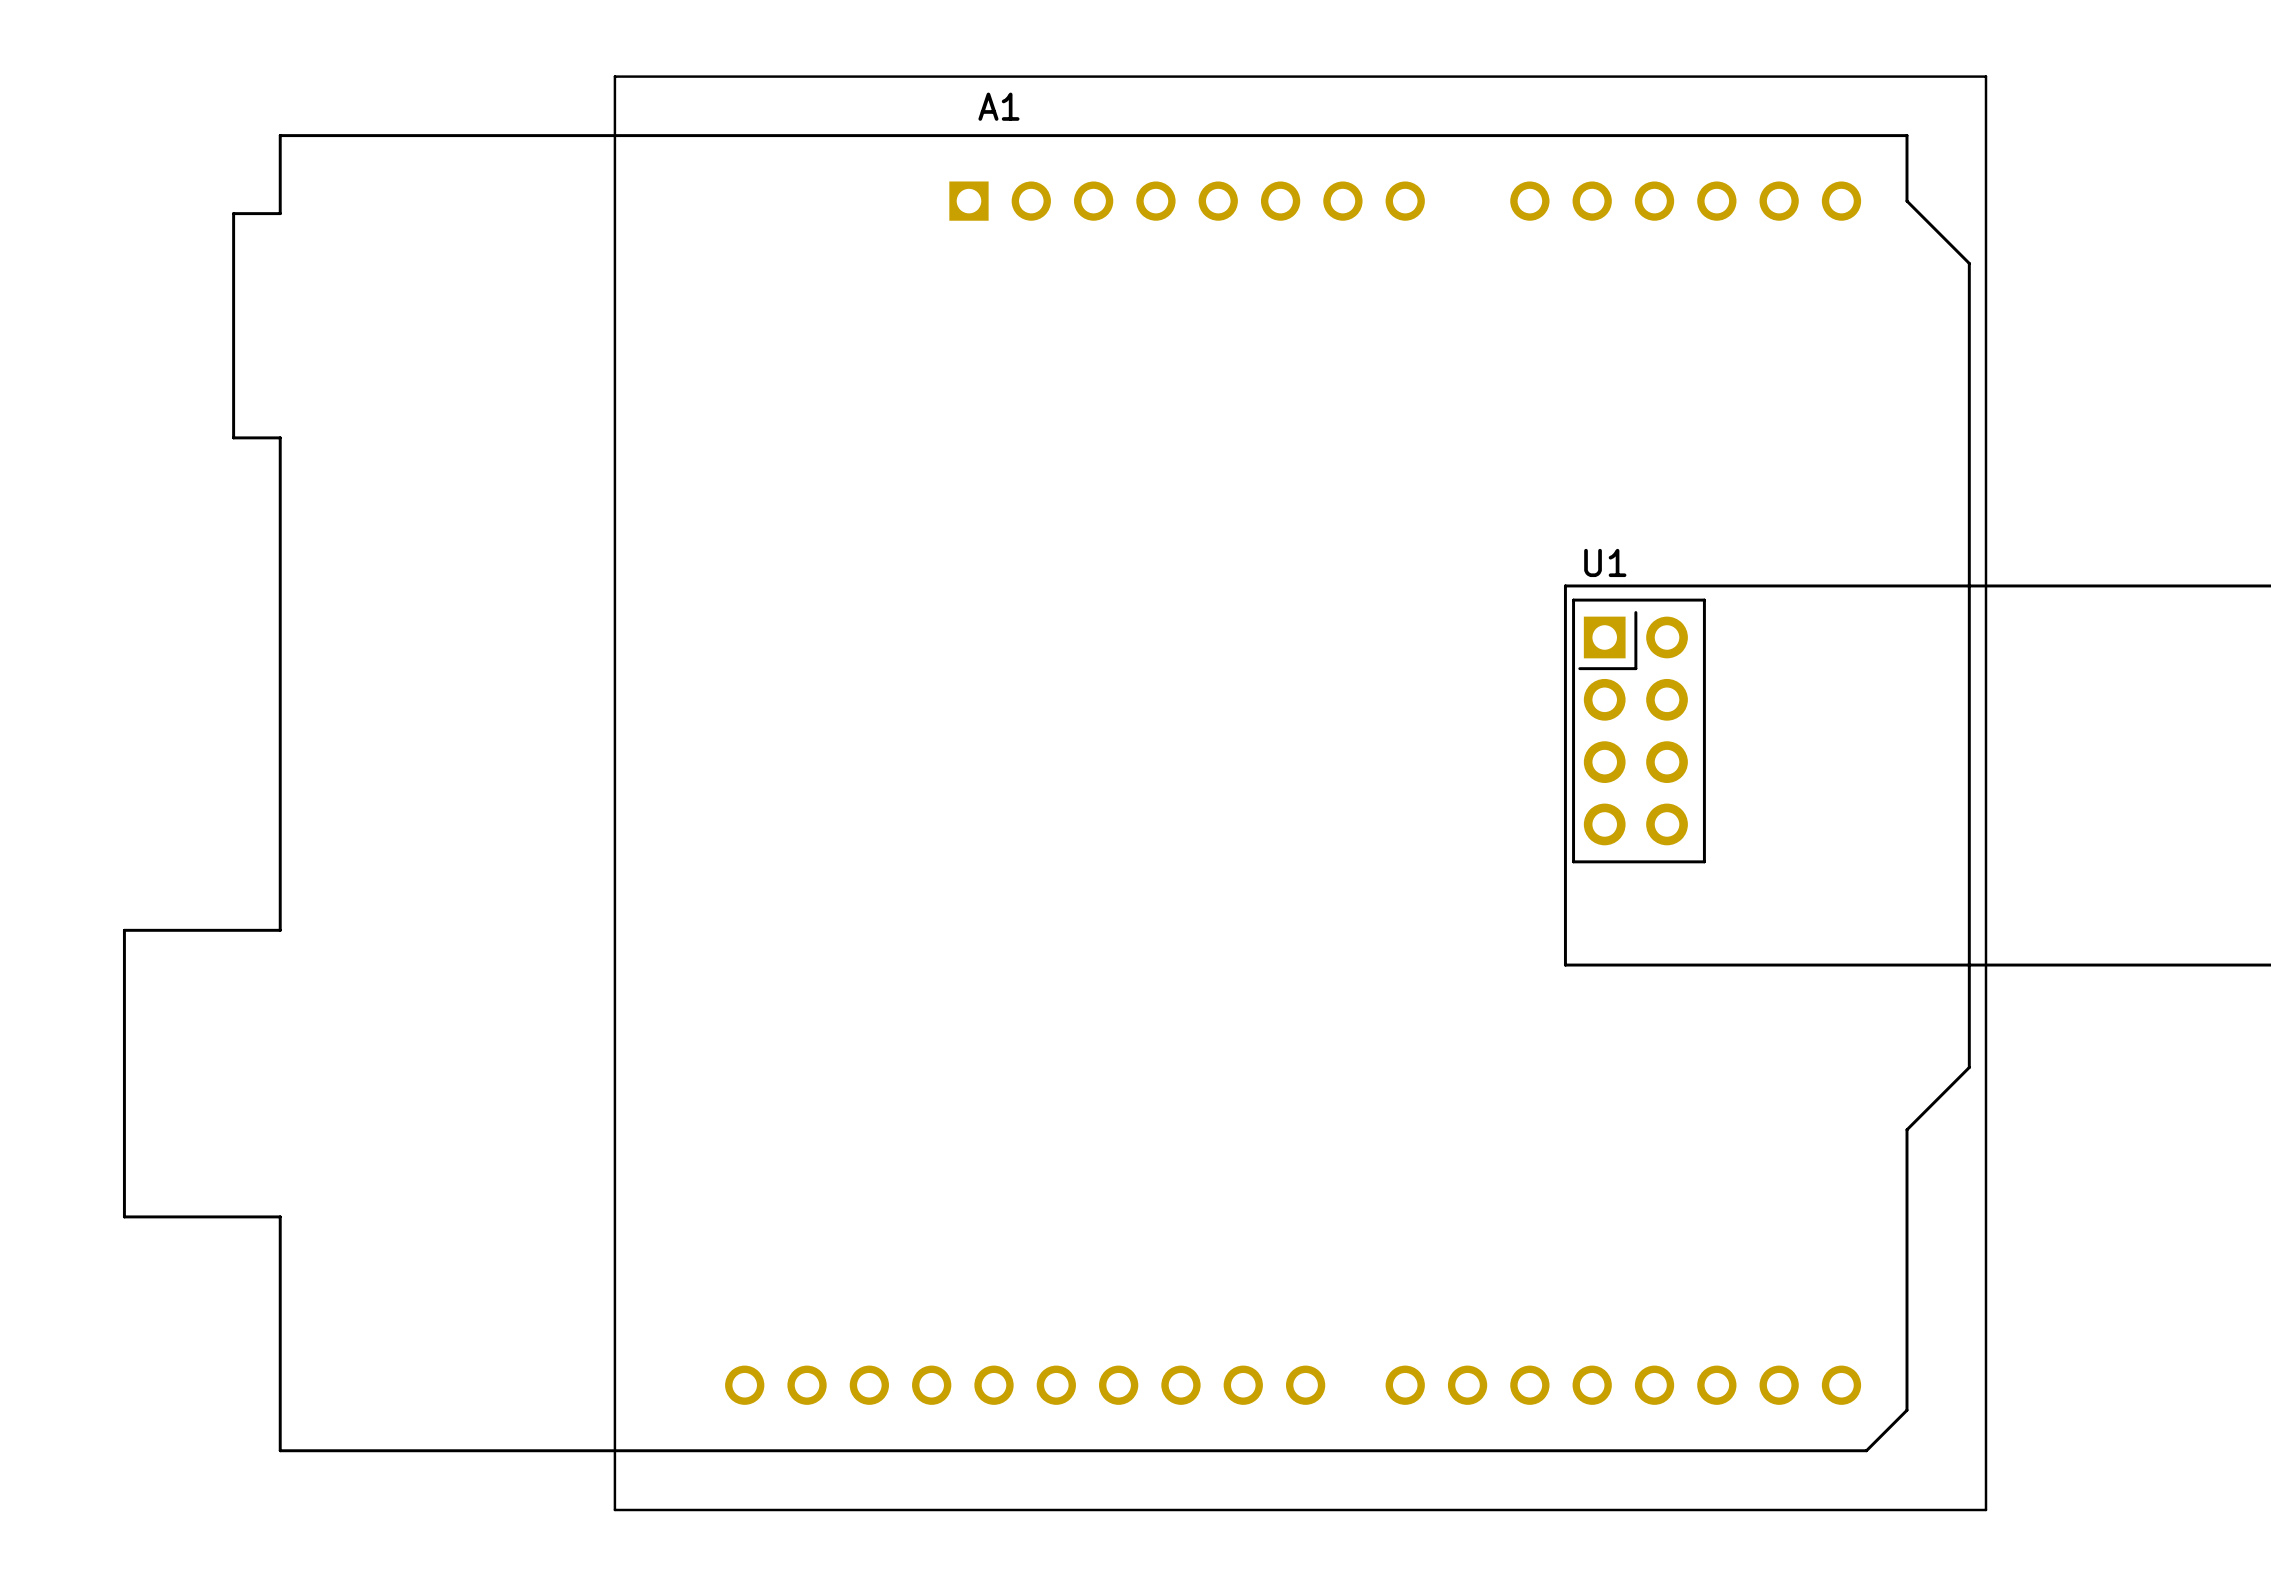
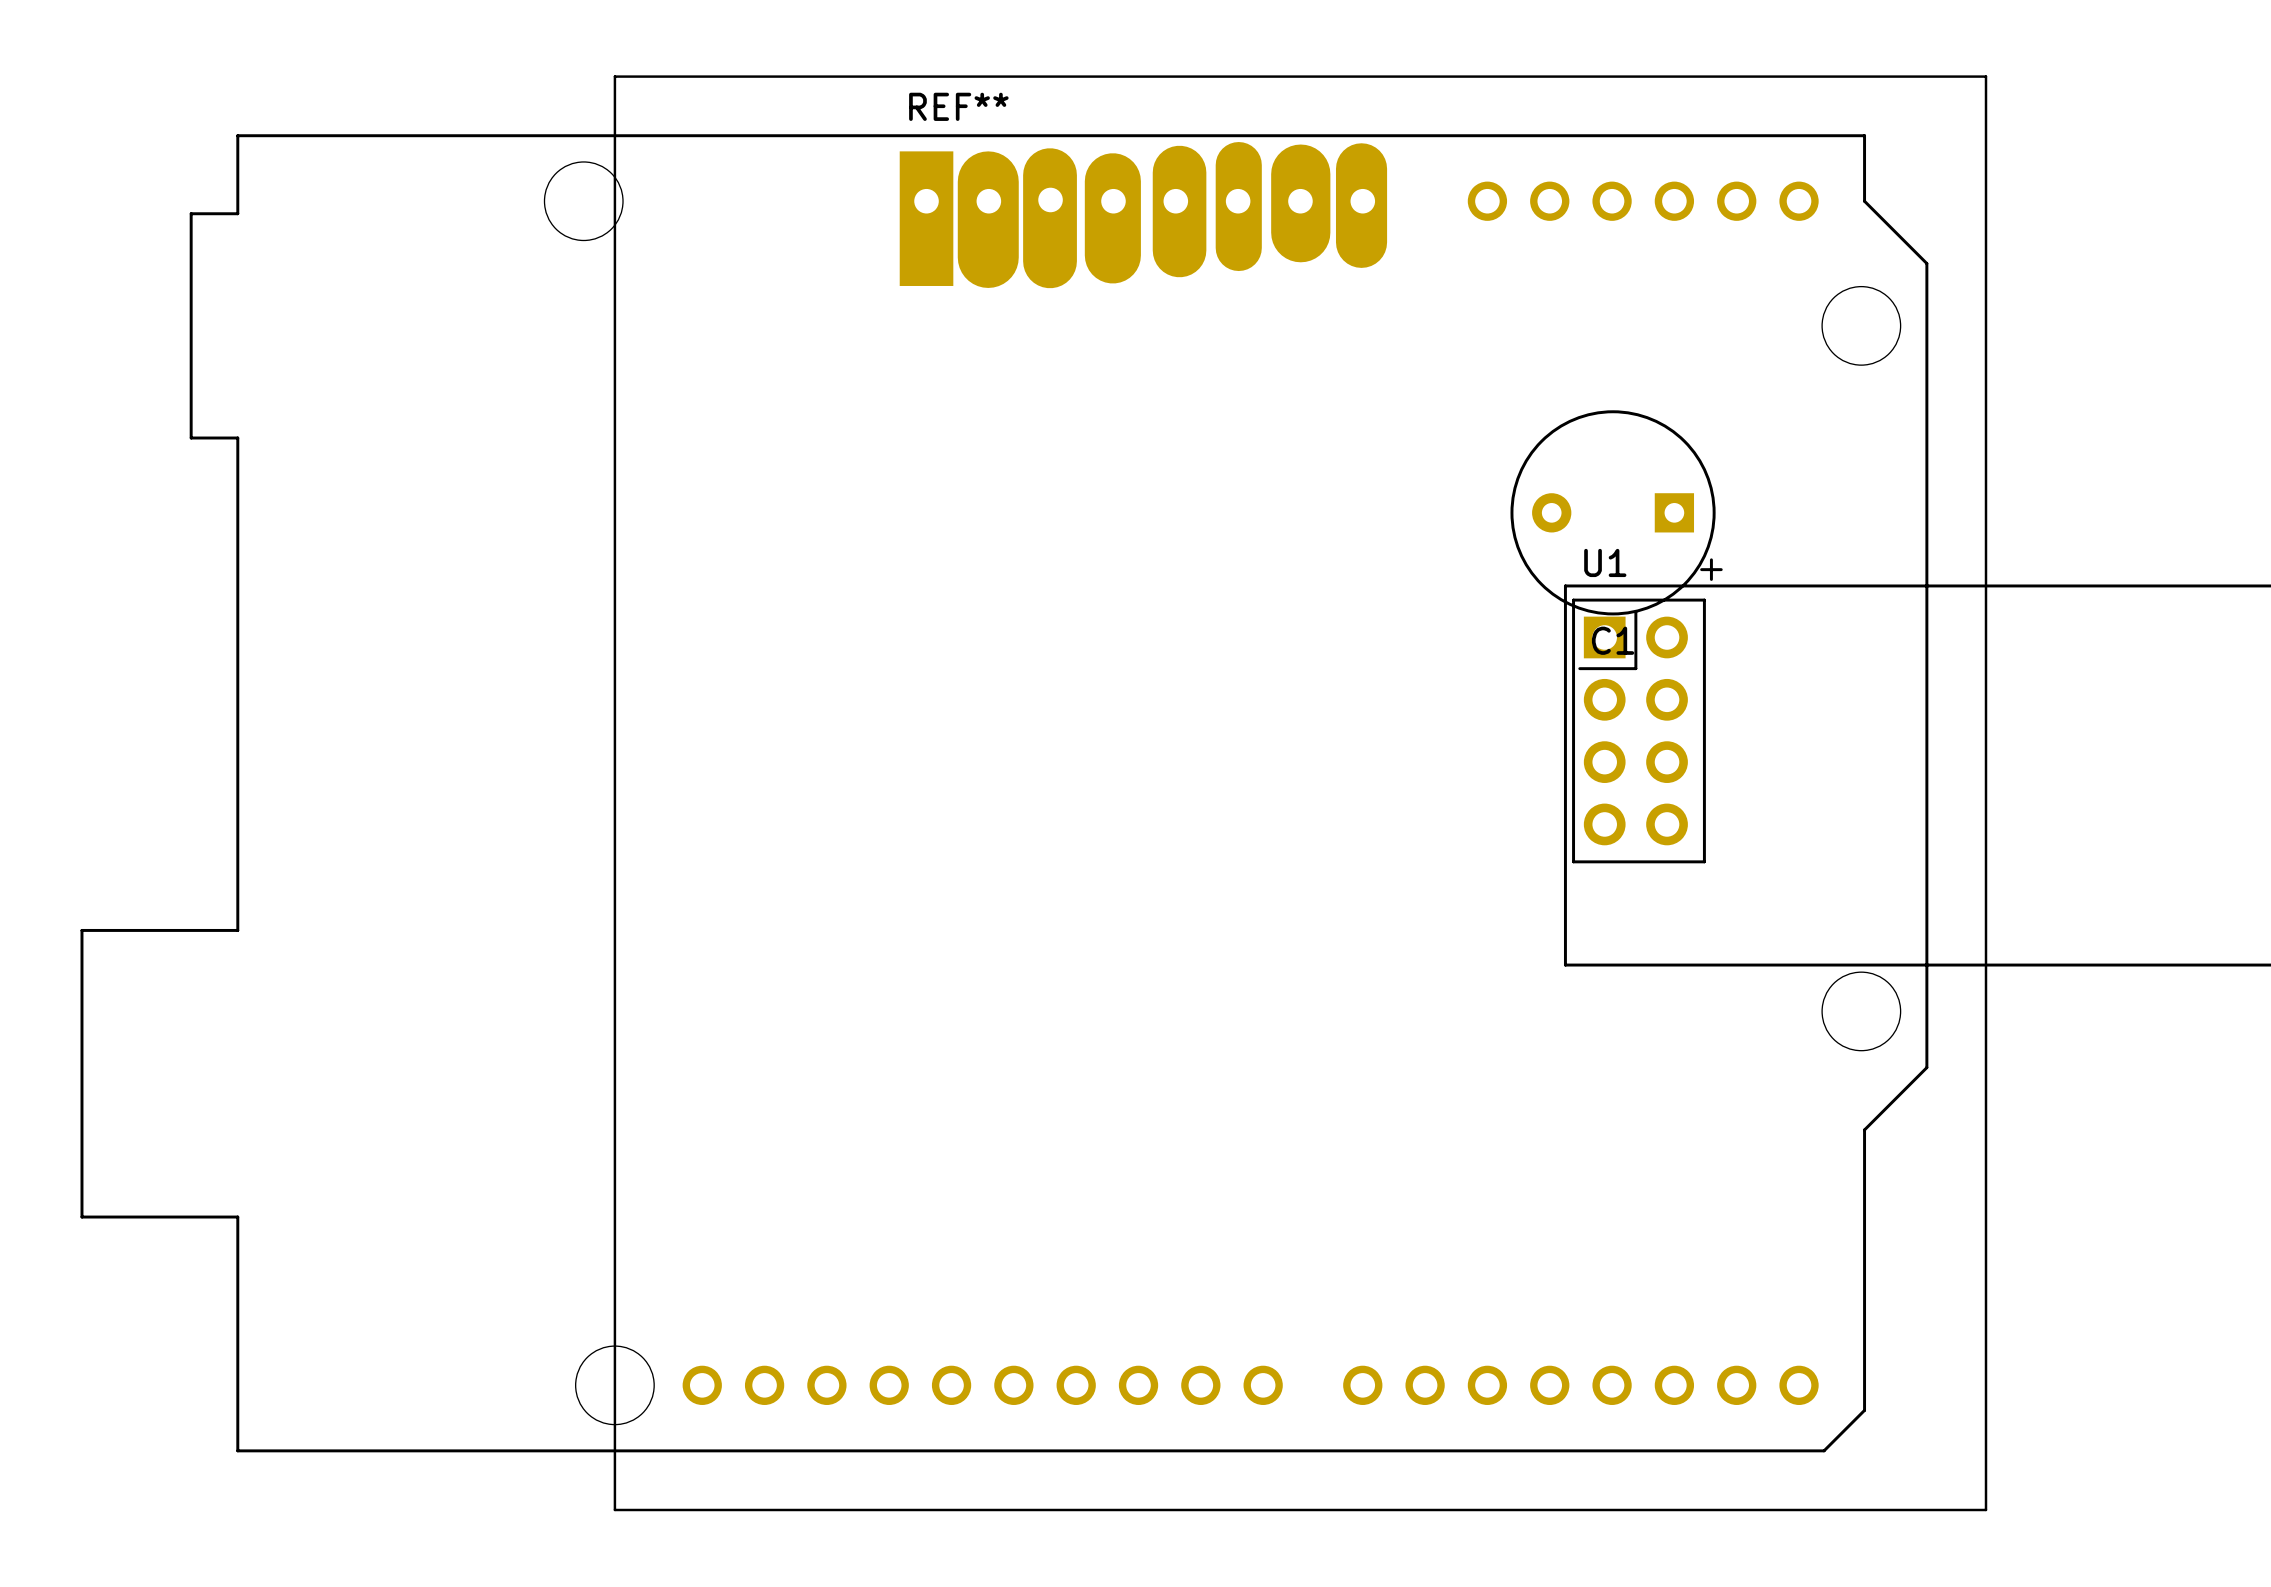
C1: none -> (1616, 512)
REF**: none -> (1004, 793)
A1: (1046, 793) -> none

